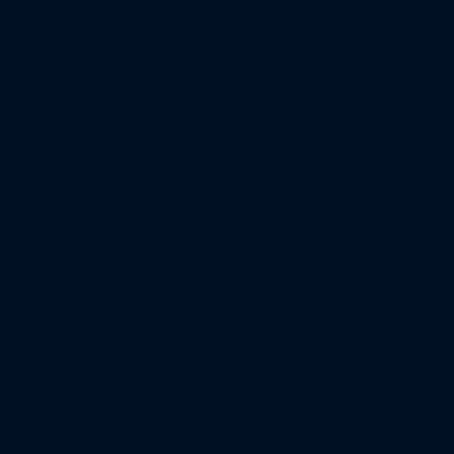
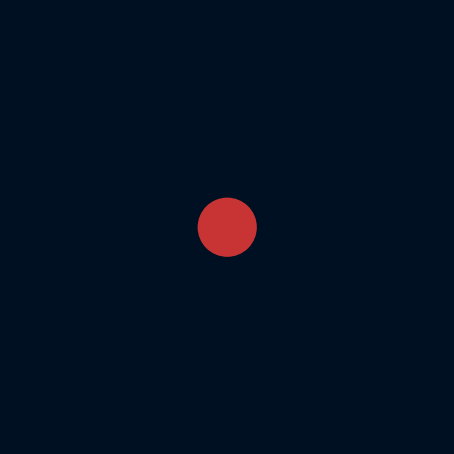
part: none -> (227, 227)

